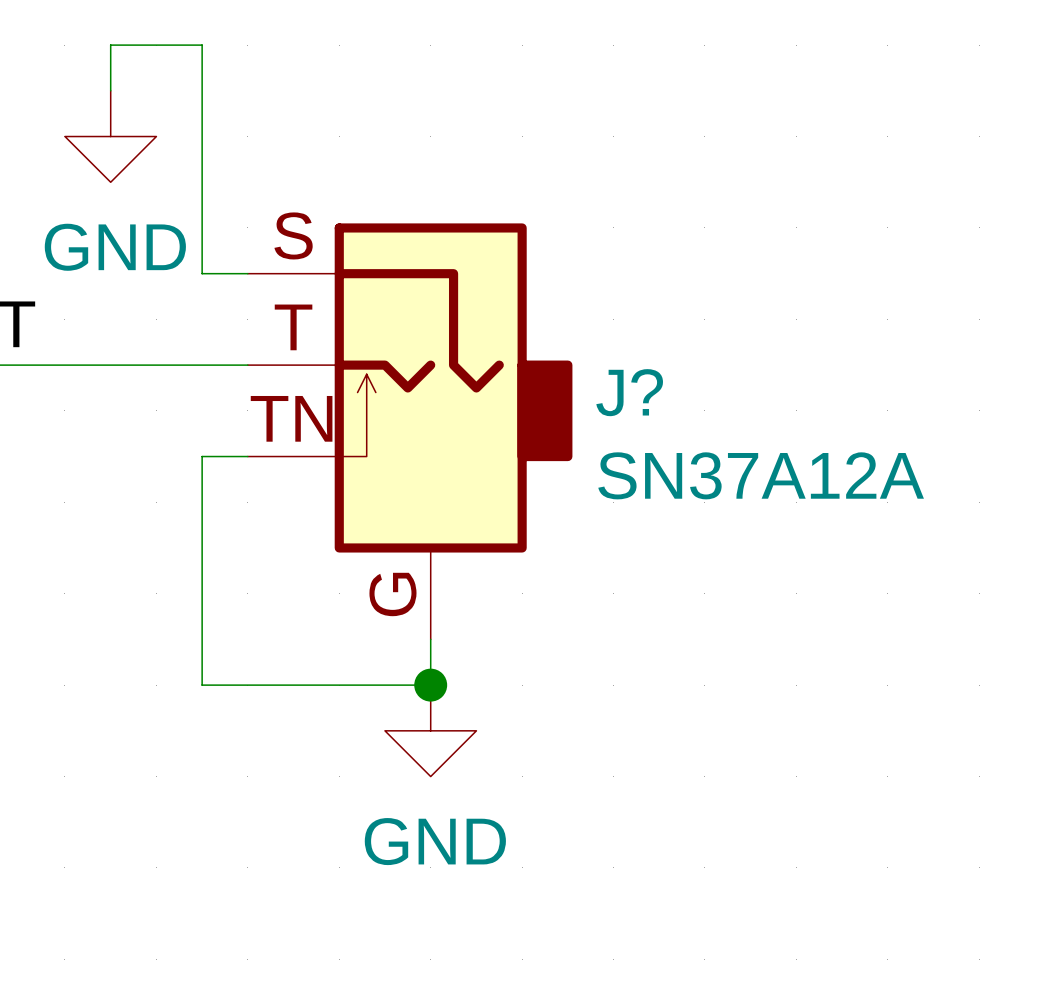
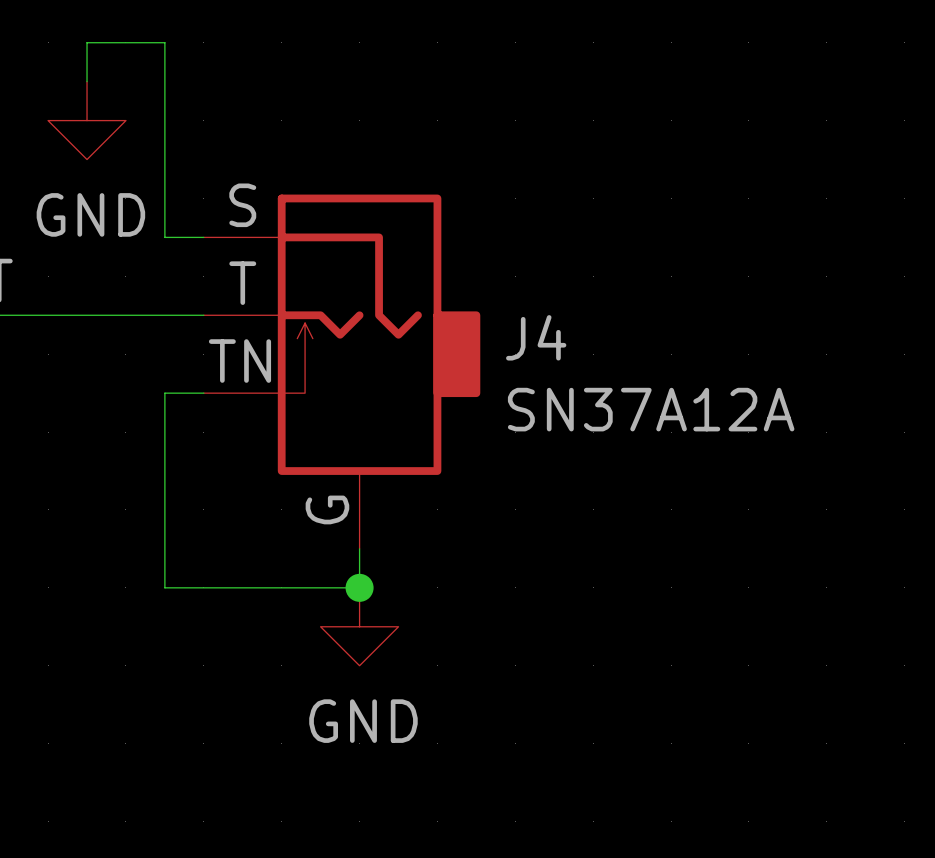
J? name: J? (629, 392) -> J4 (536, 337)

